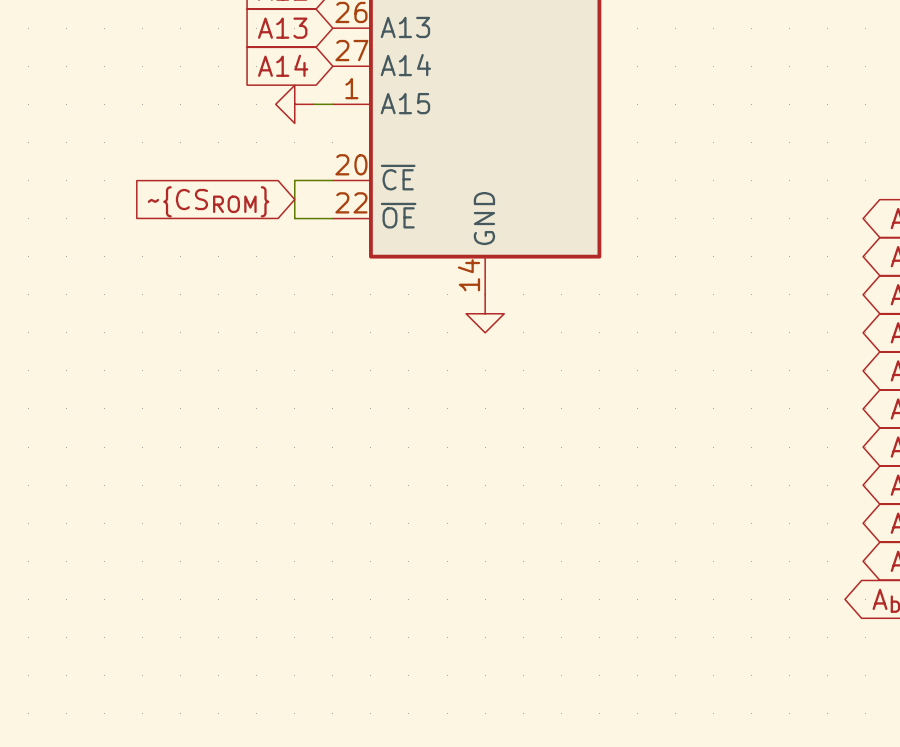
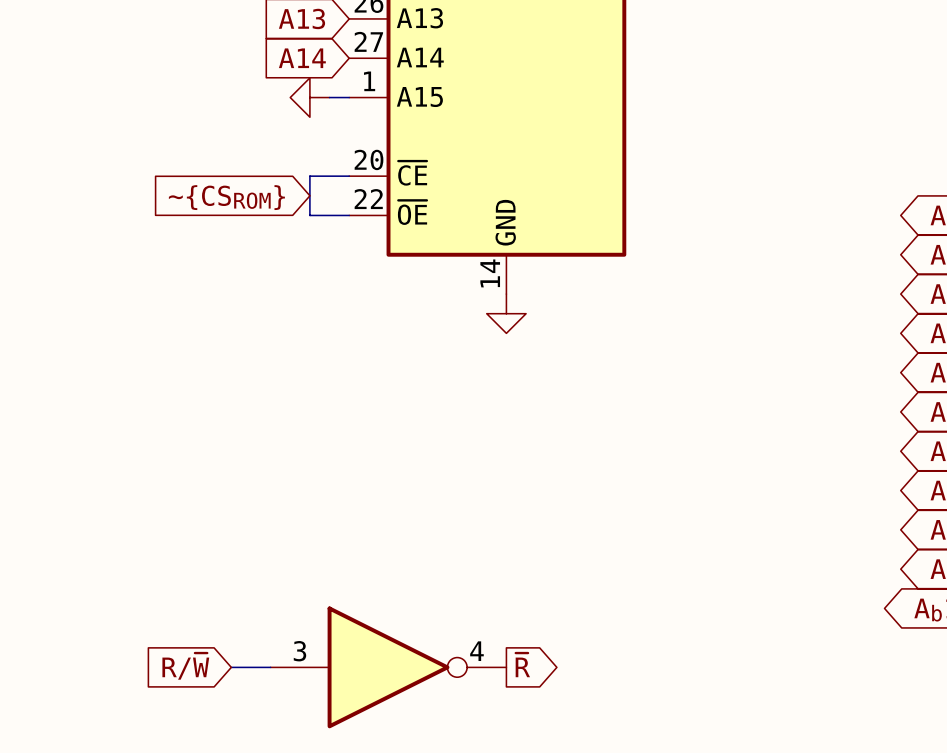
global label: none -> ~{R} (522, 665)
global label: none -> R/~{W} (185, 666)
wire: none -> (231, 667) (270, 667)
part: none -> (388, 667)

